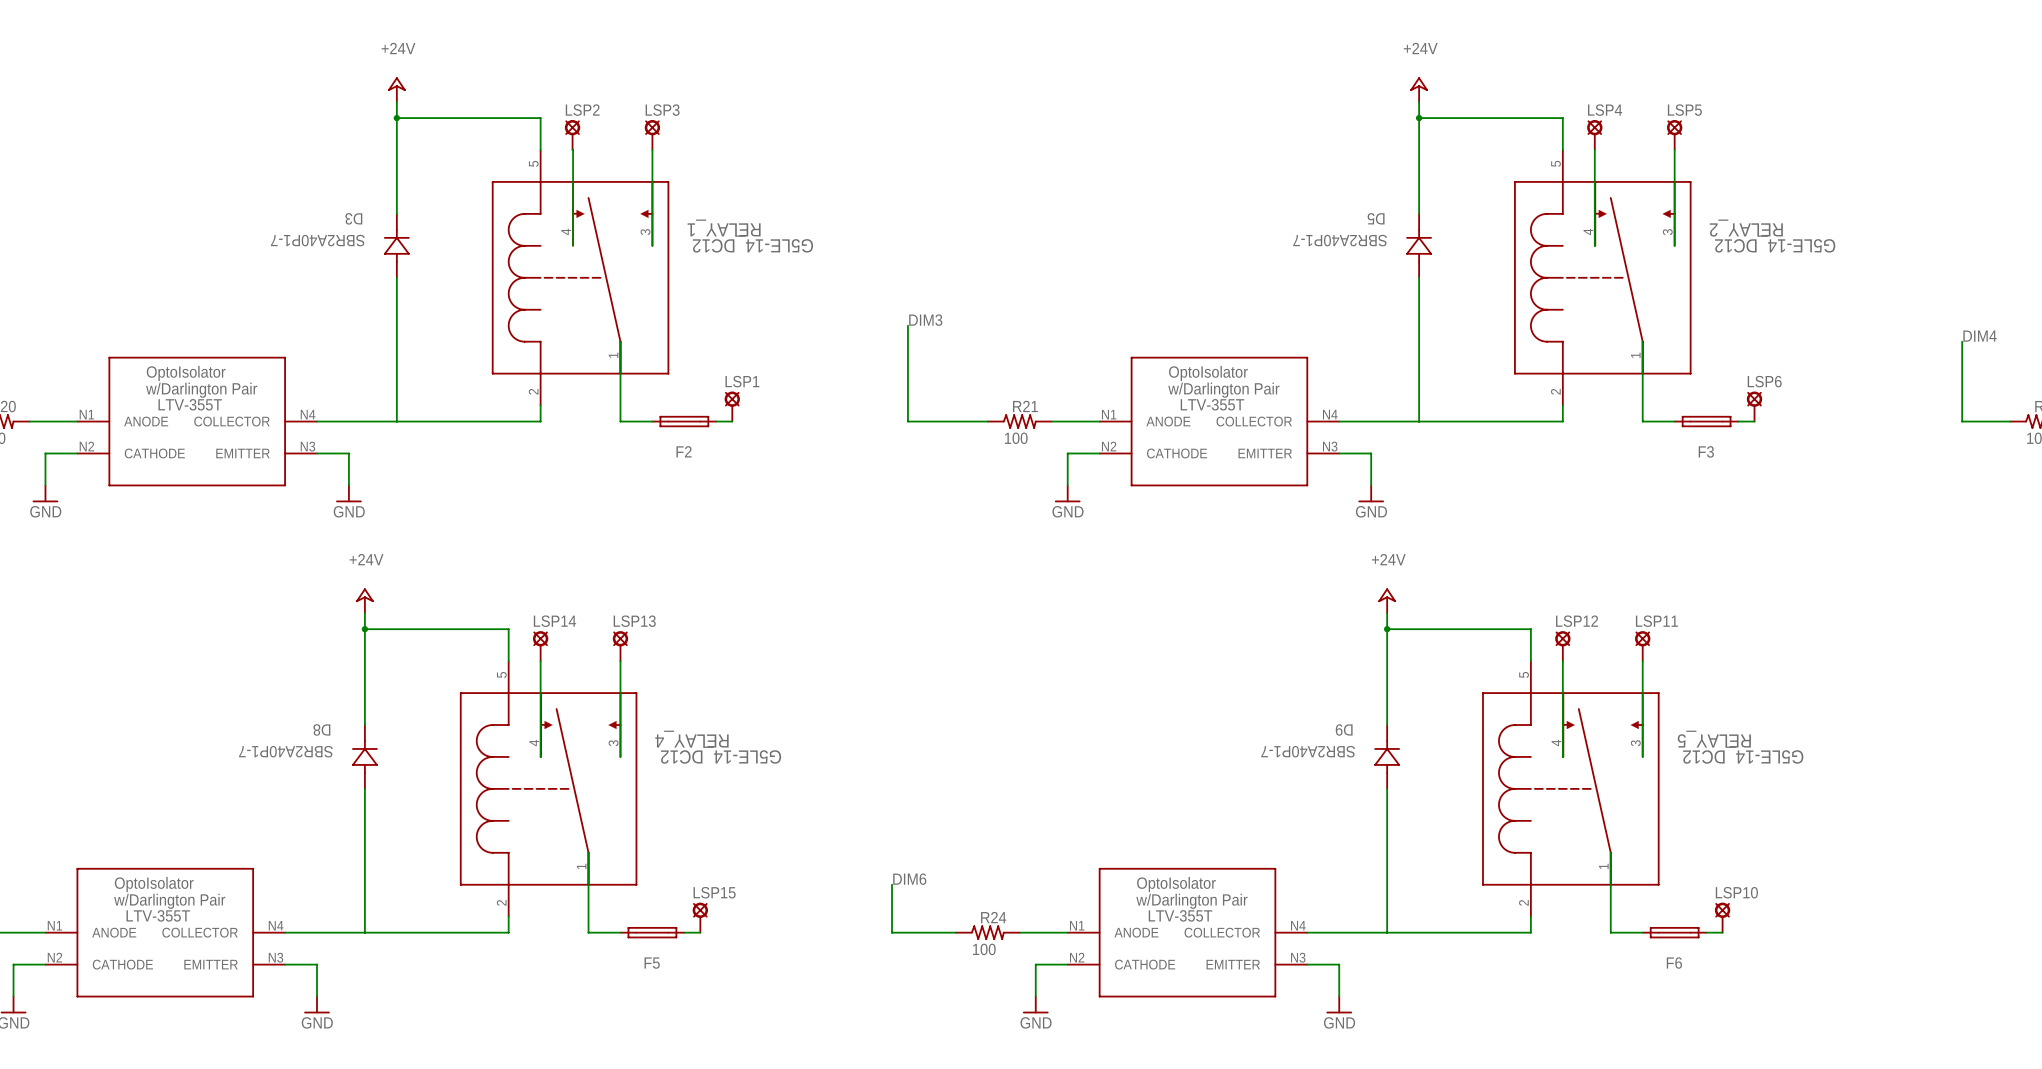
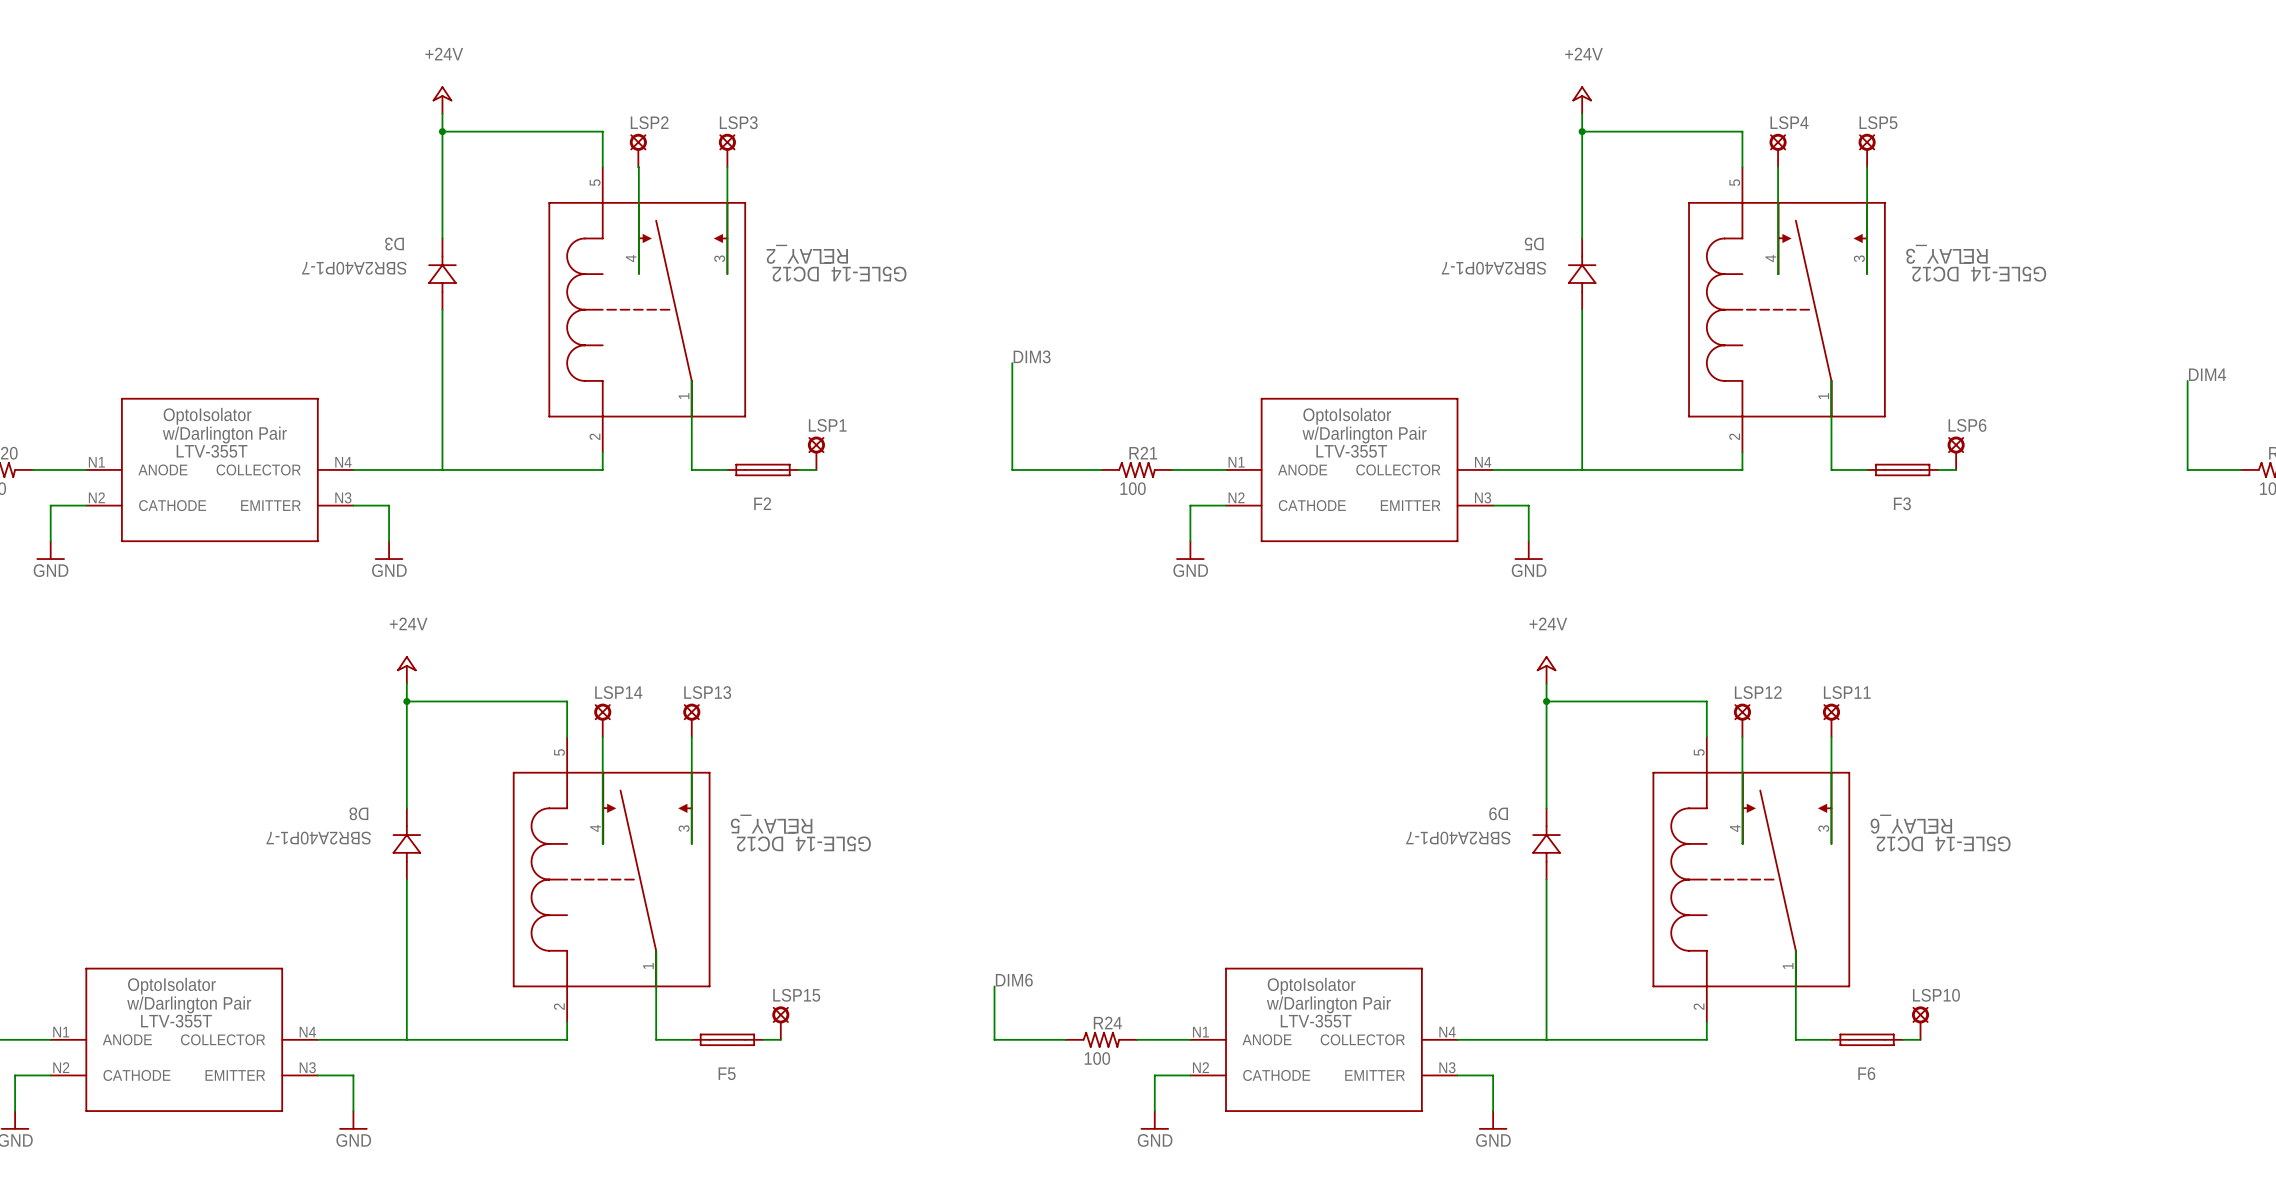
RELAY_1 name: RELAY_1 (724, 227) -> RELAY_2 (807, 254)
RELAY_2 name: RELAY_2 (1746, 228) -> RELAY_3 (1946, 254)
RELAY_4 name: RELAY_4 (691, 739) -> RELAY_5 (771, 824)
RELAY_5 name: RELAY_5 (1714, 739) -> RELAY_6 (1911, 824)

